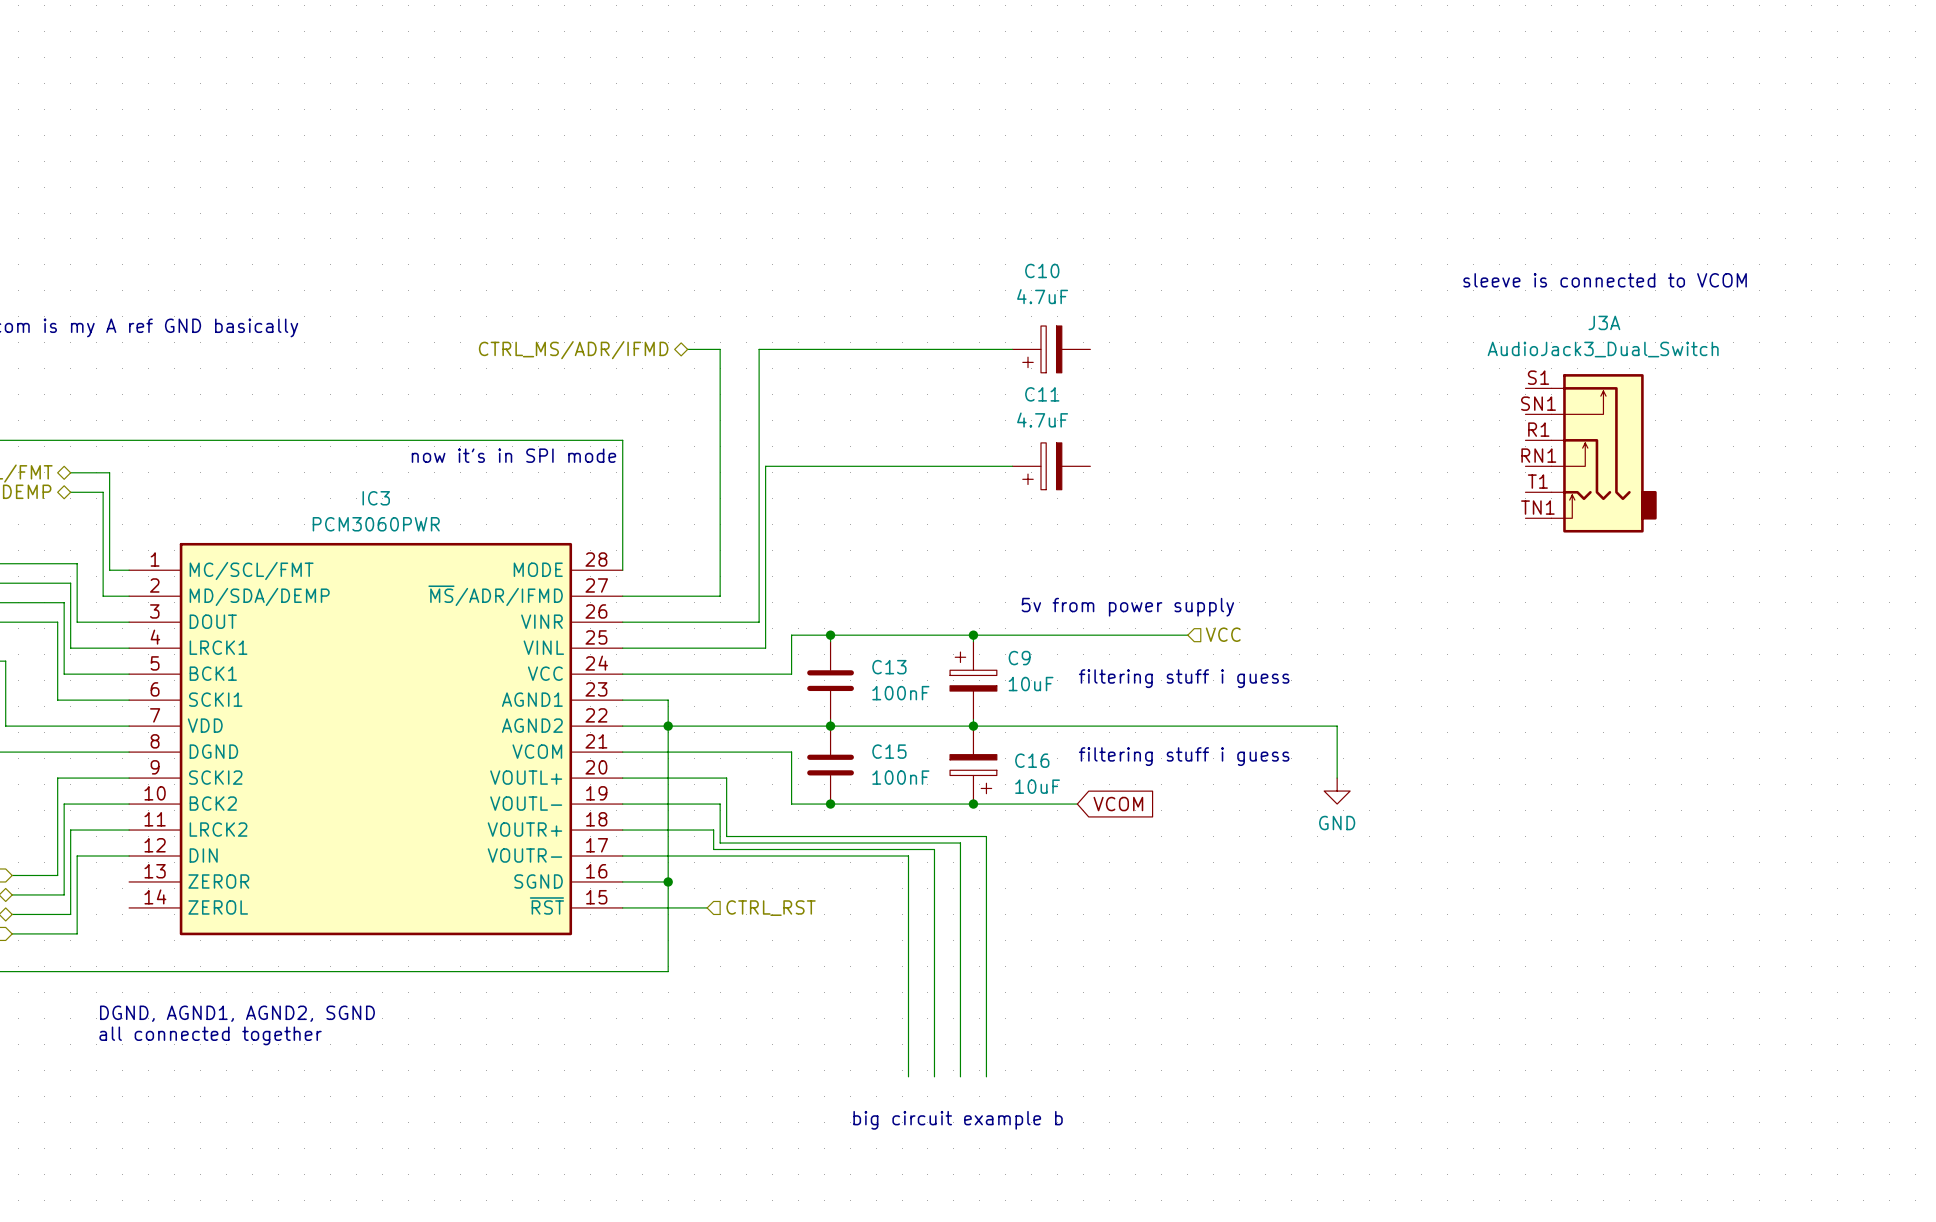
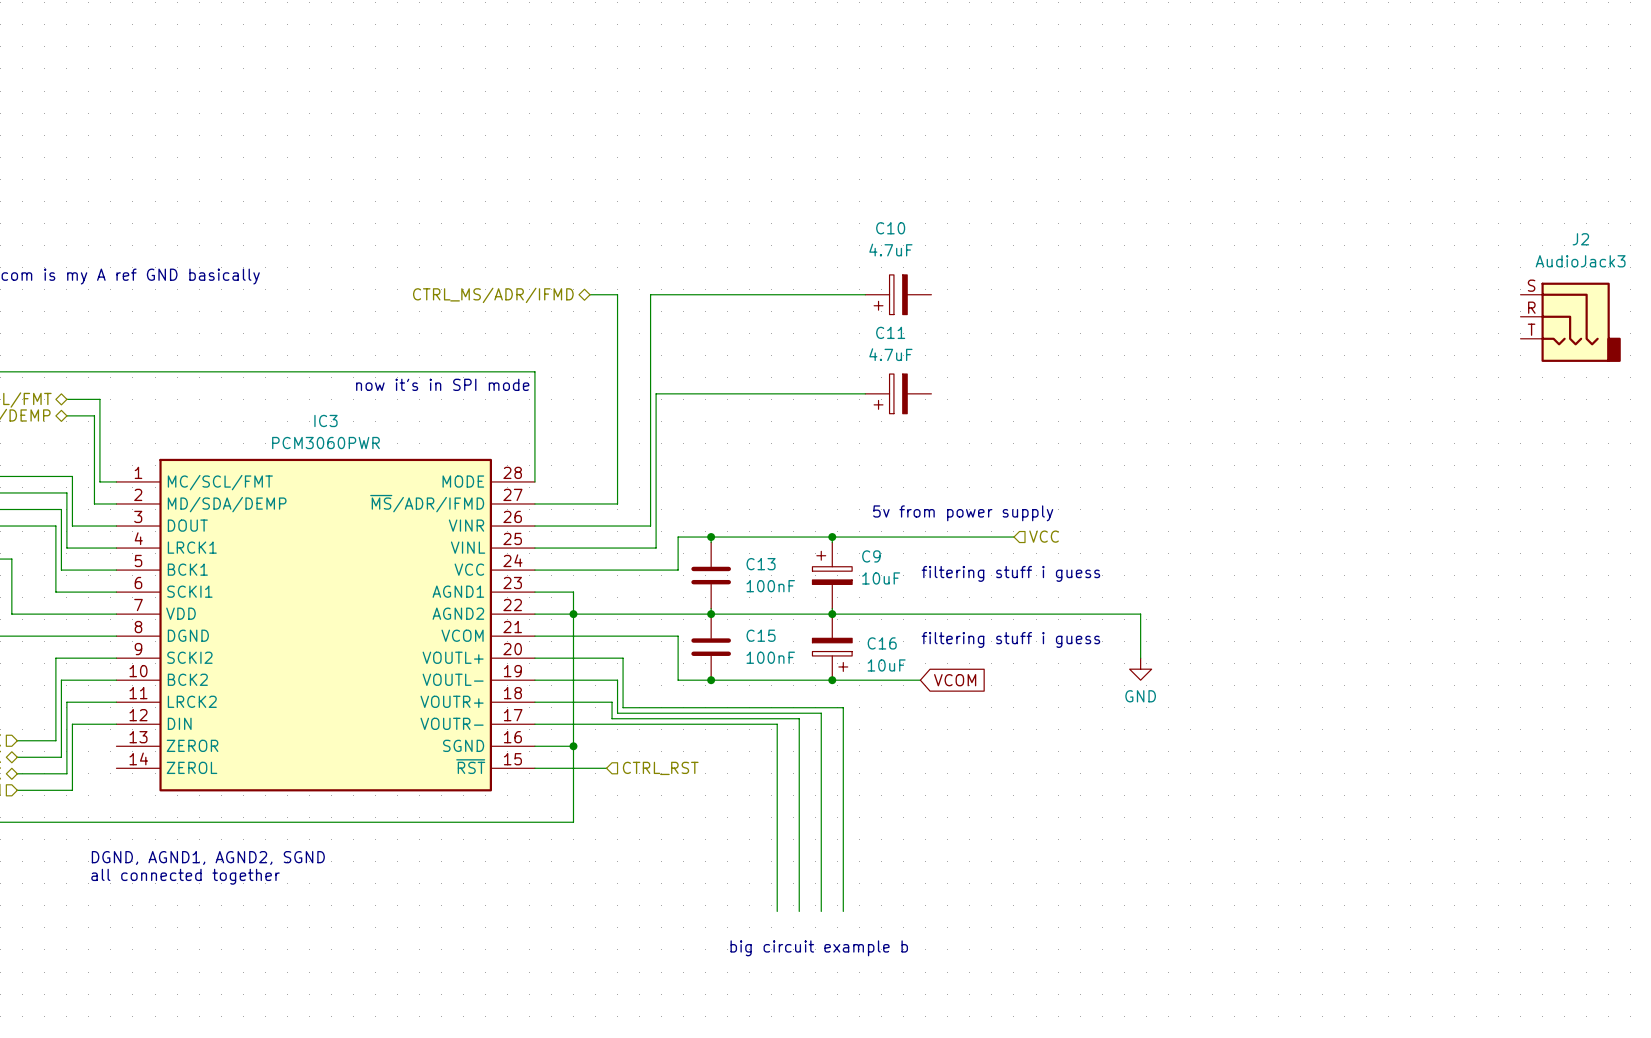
text: sleeve is connected to VCOM (1605, 280) -> none
J2: none -> AudioJack3 (1570, 322)
J3A: AudioJack3_Dual_Switch (1591, 453) -> none

